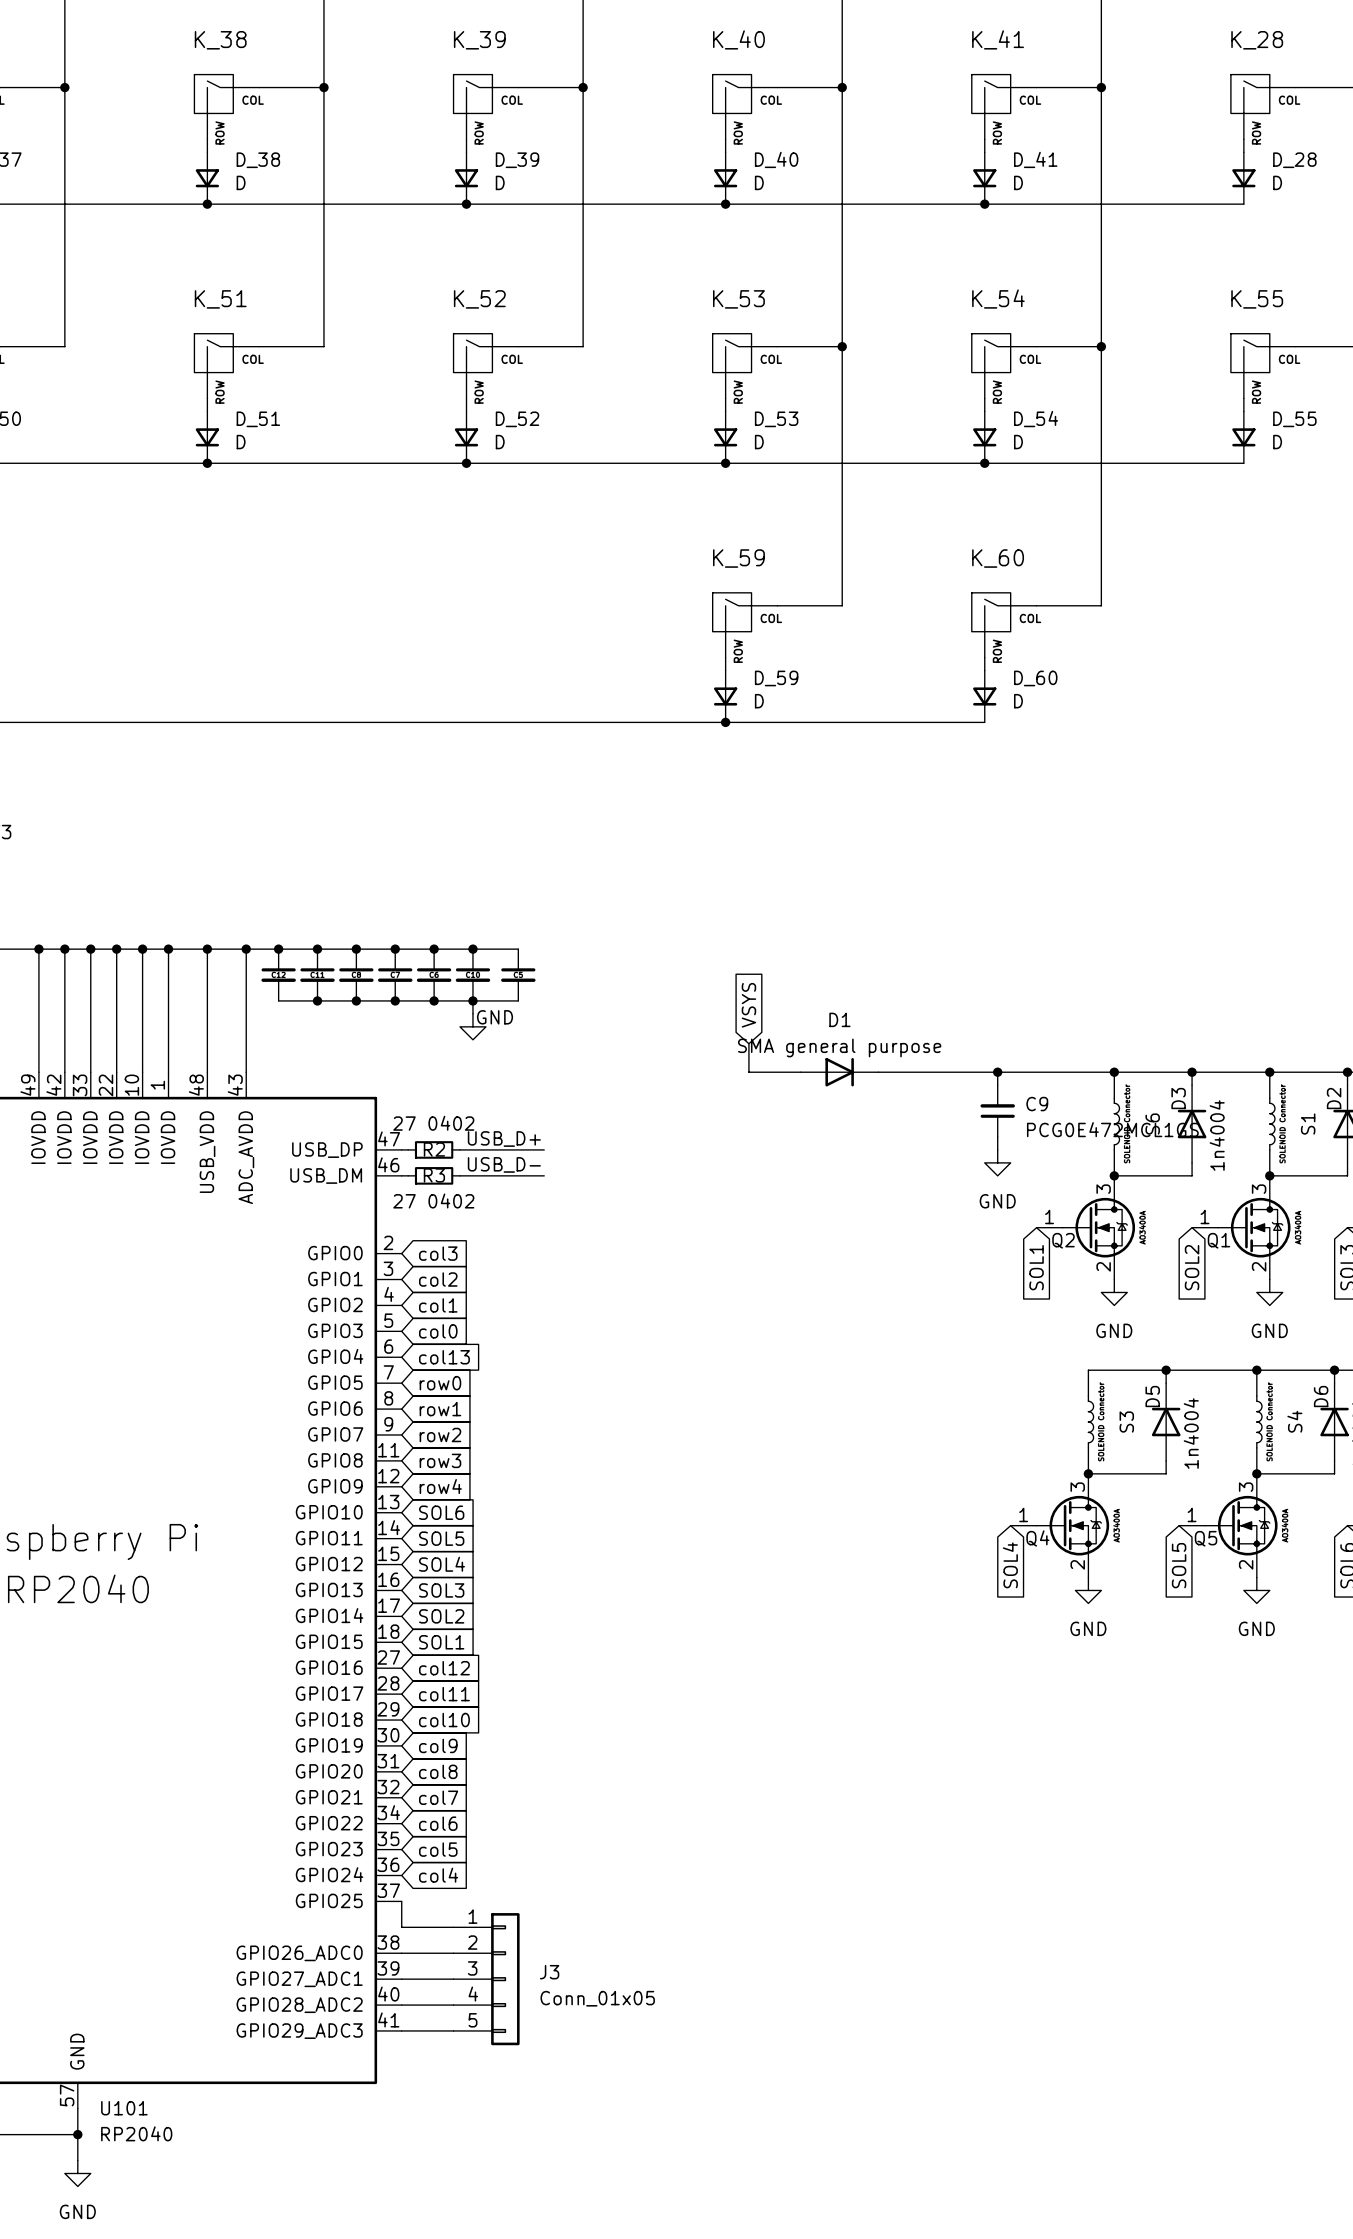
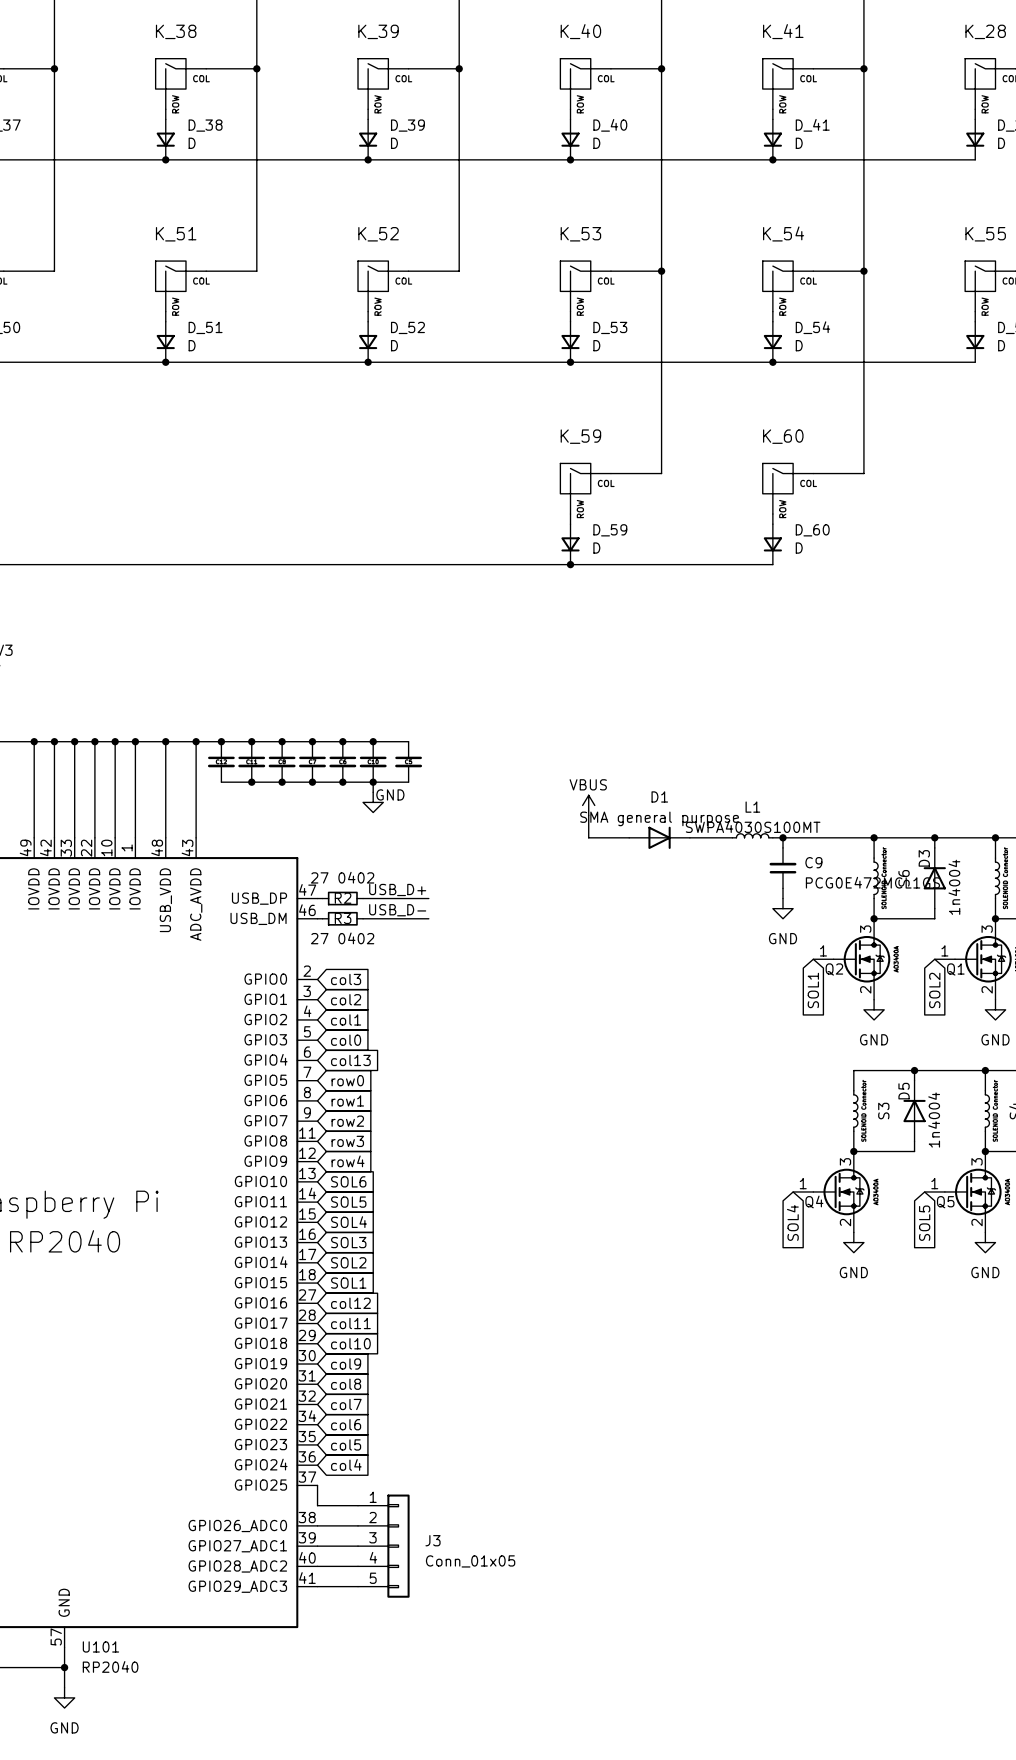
global label: VSYS (748, 1005) -> none
power symbol: none -> VBUS (588, 805)
L1: none -> SWPA4030S100MT (752, 835)
wire: (932, 1072) (984, 1072) -> none

